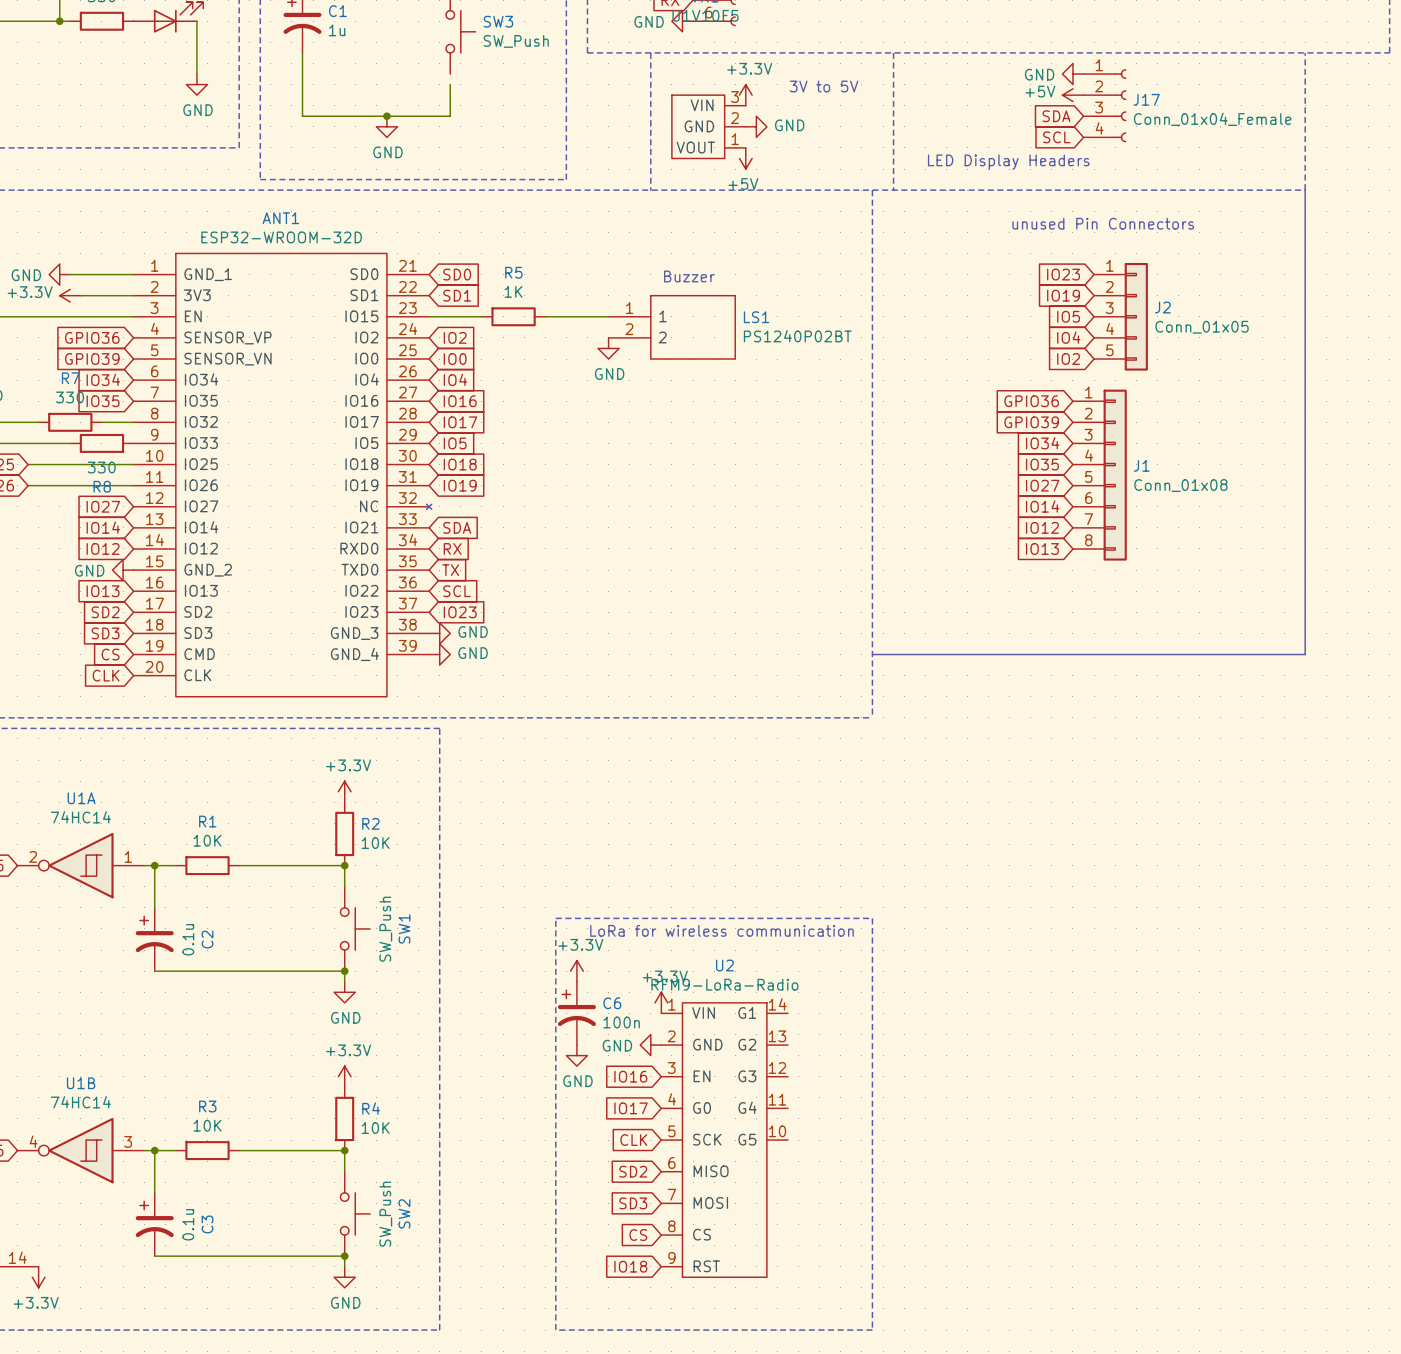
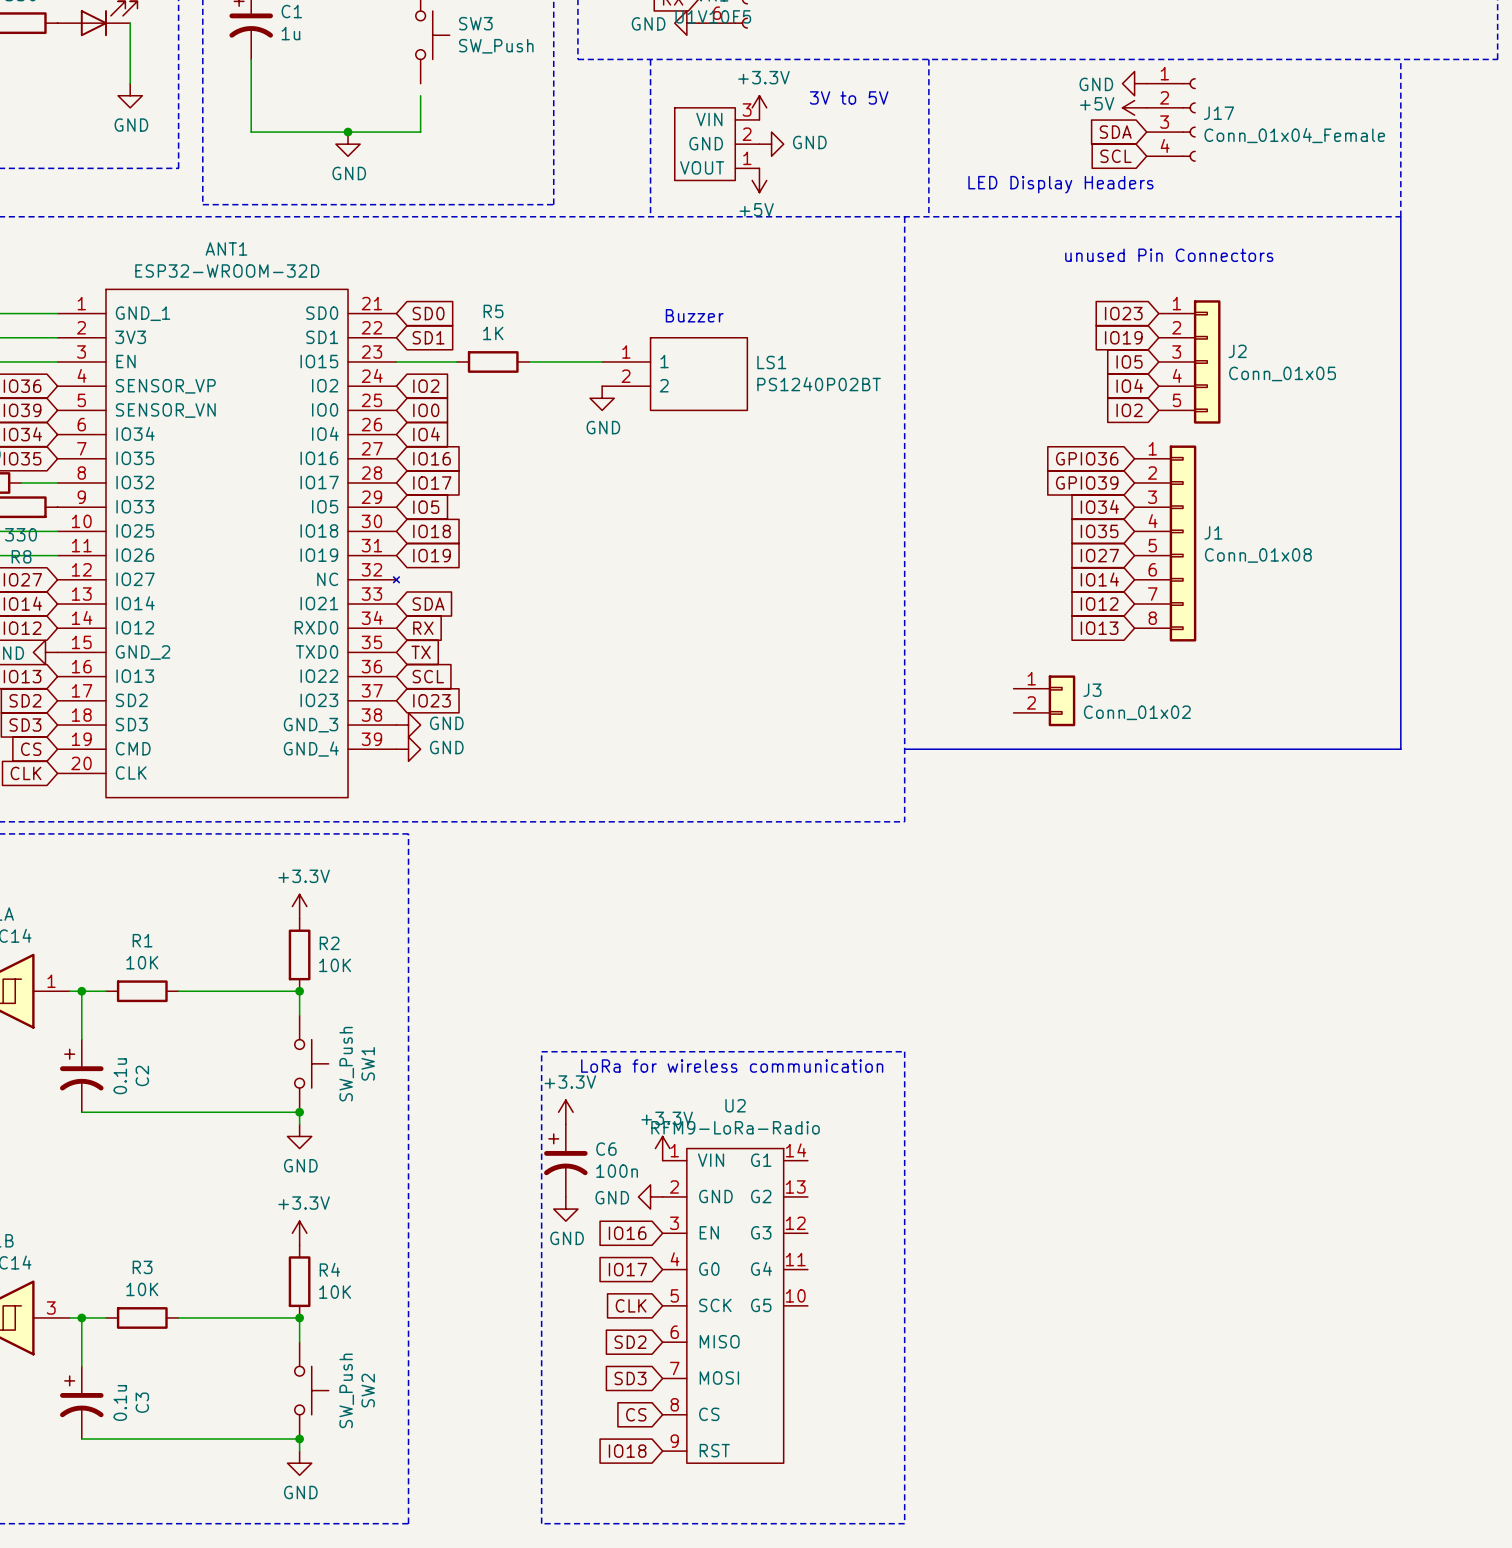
J3: none -> Conn_01x02 (1044, 700)

